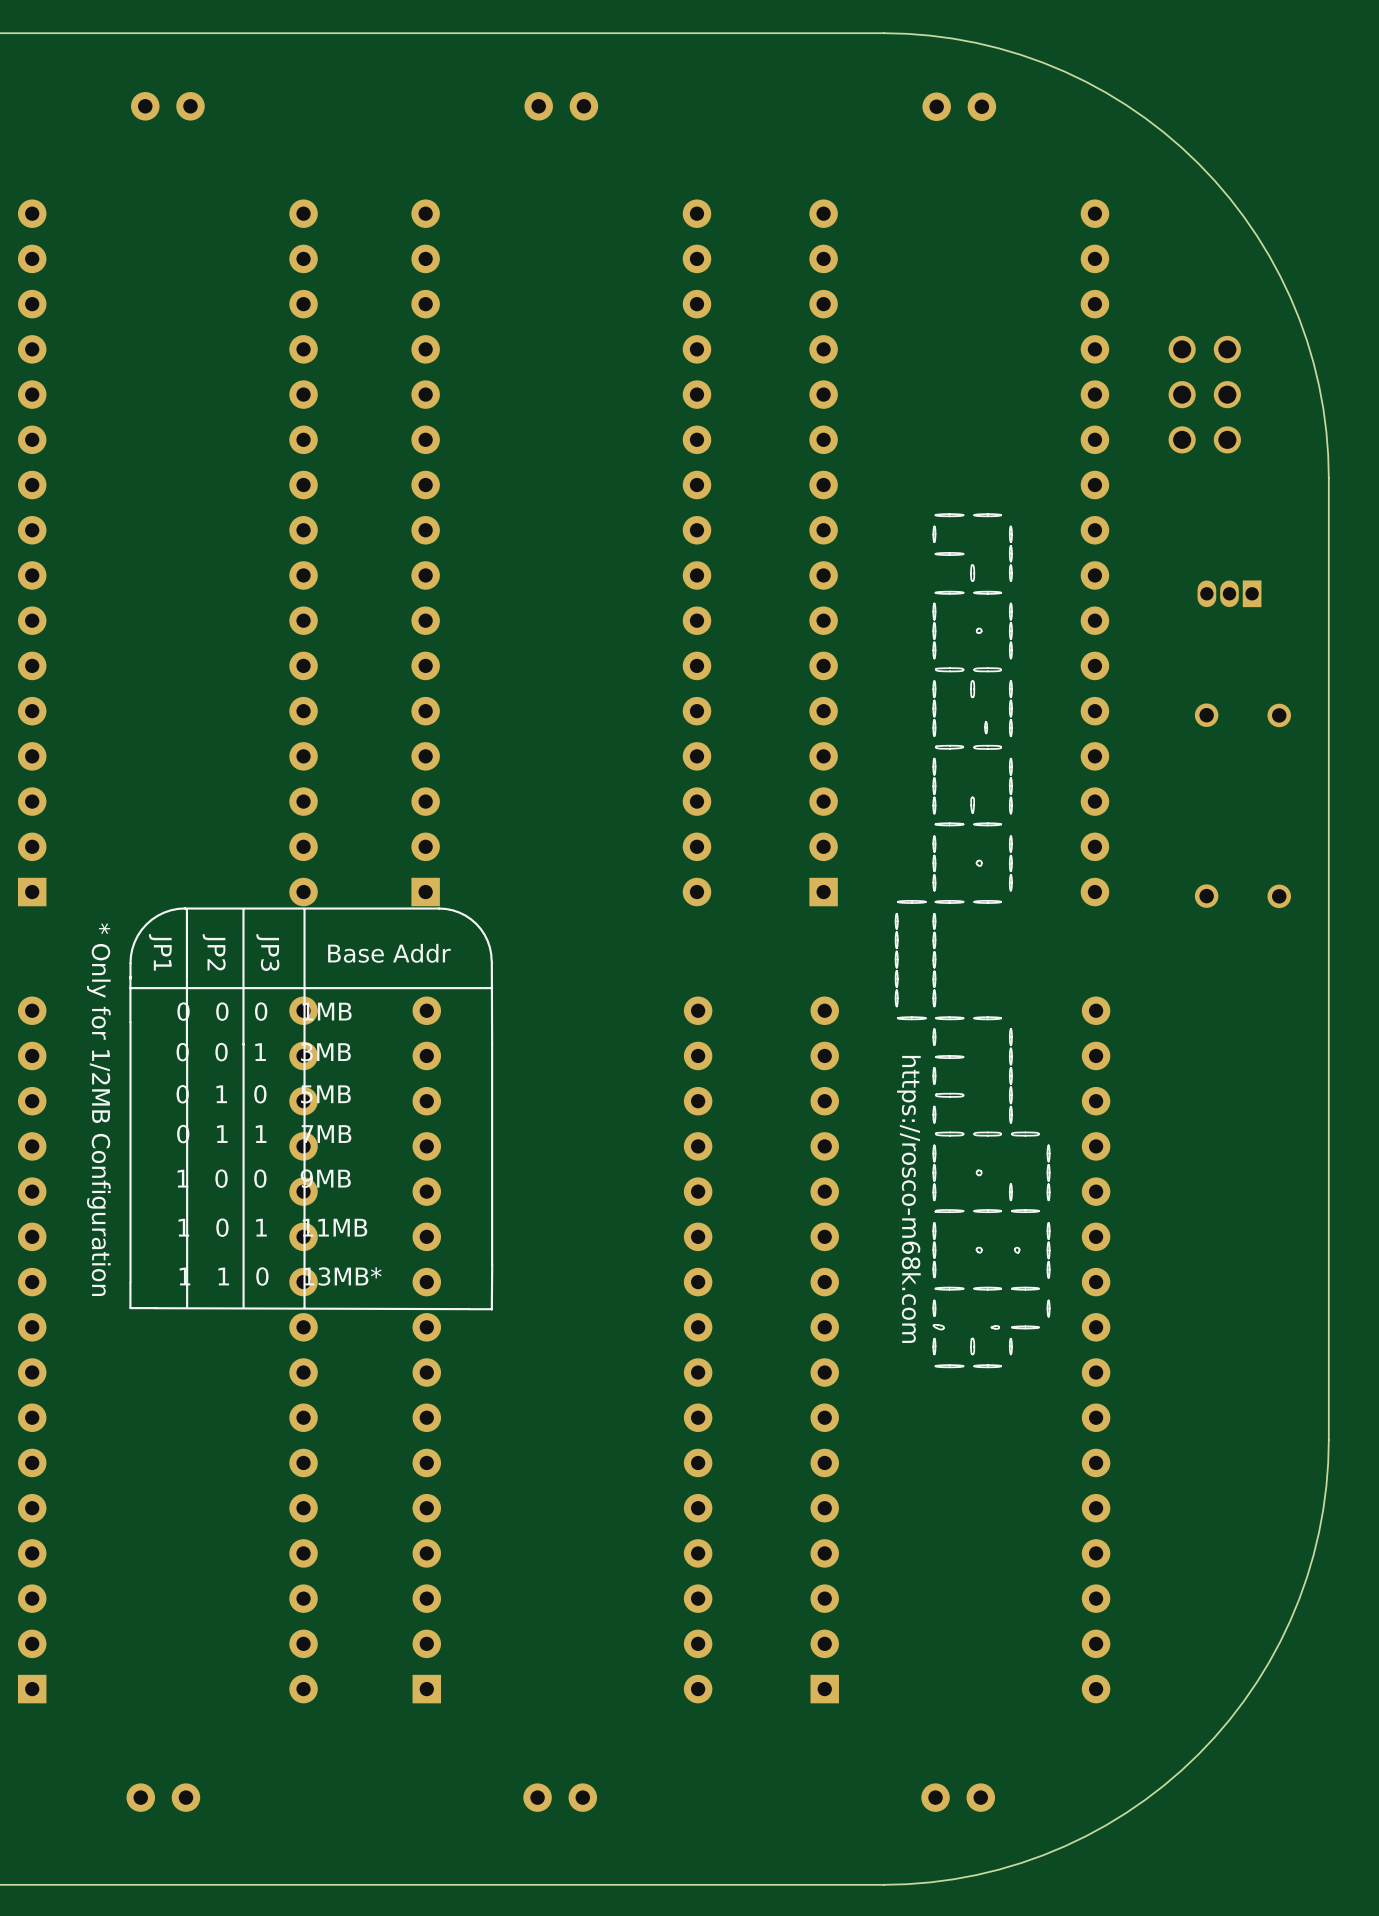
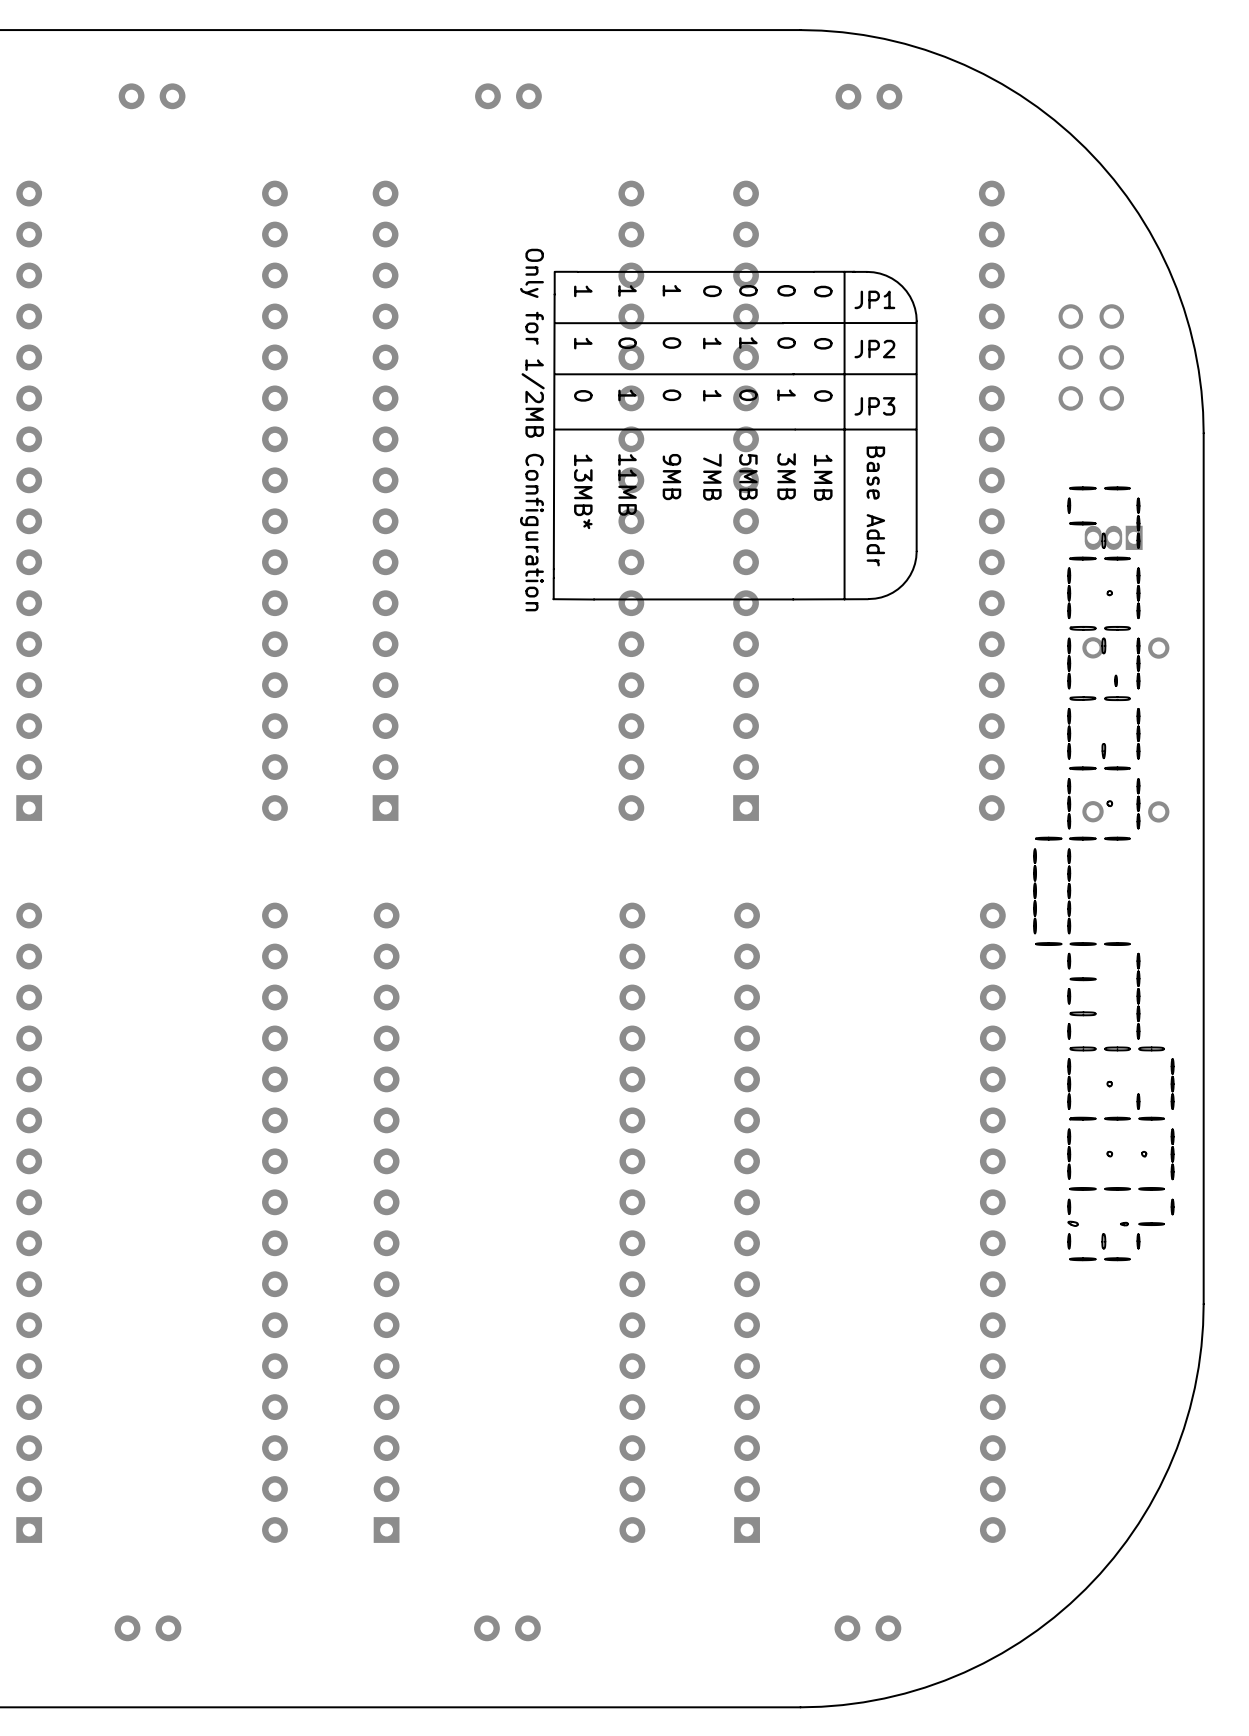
drawing: none -> [552, 270, 918, 601]
drawing: [129, 907, 494, 1311] -> none
drawing position: (972, 940) -> (1103, 873)
text: https://rosco-m68k.com (908, 1199) -> none

